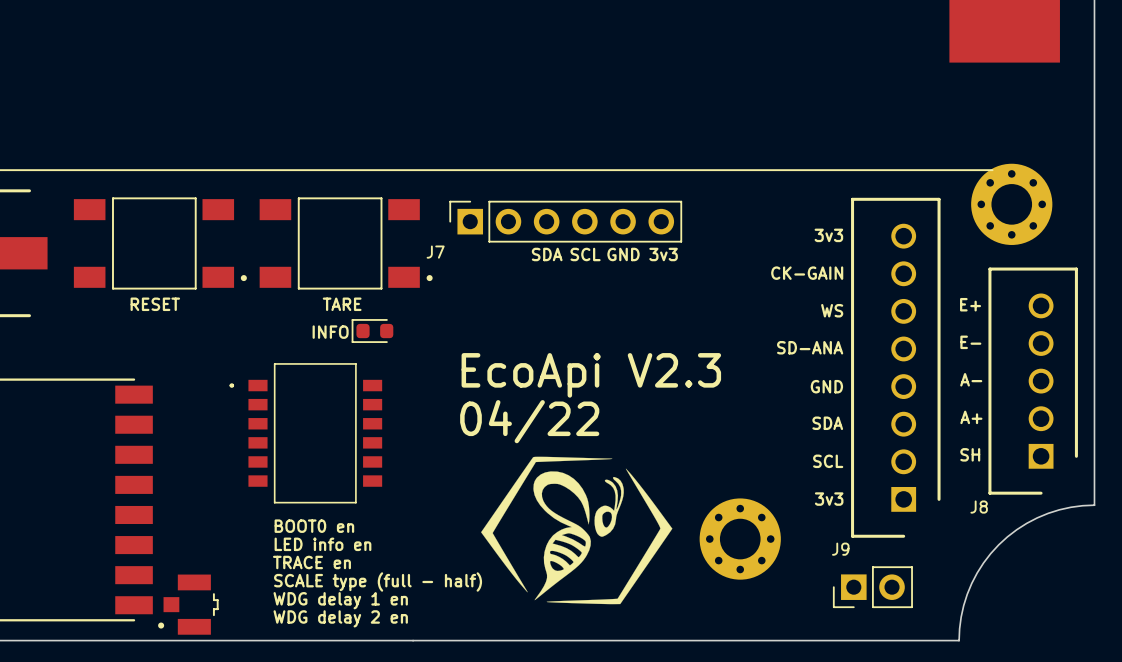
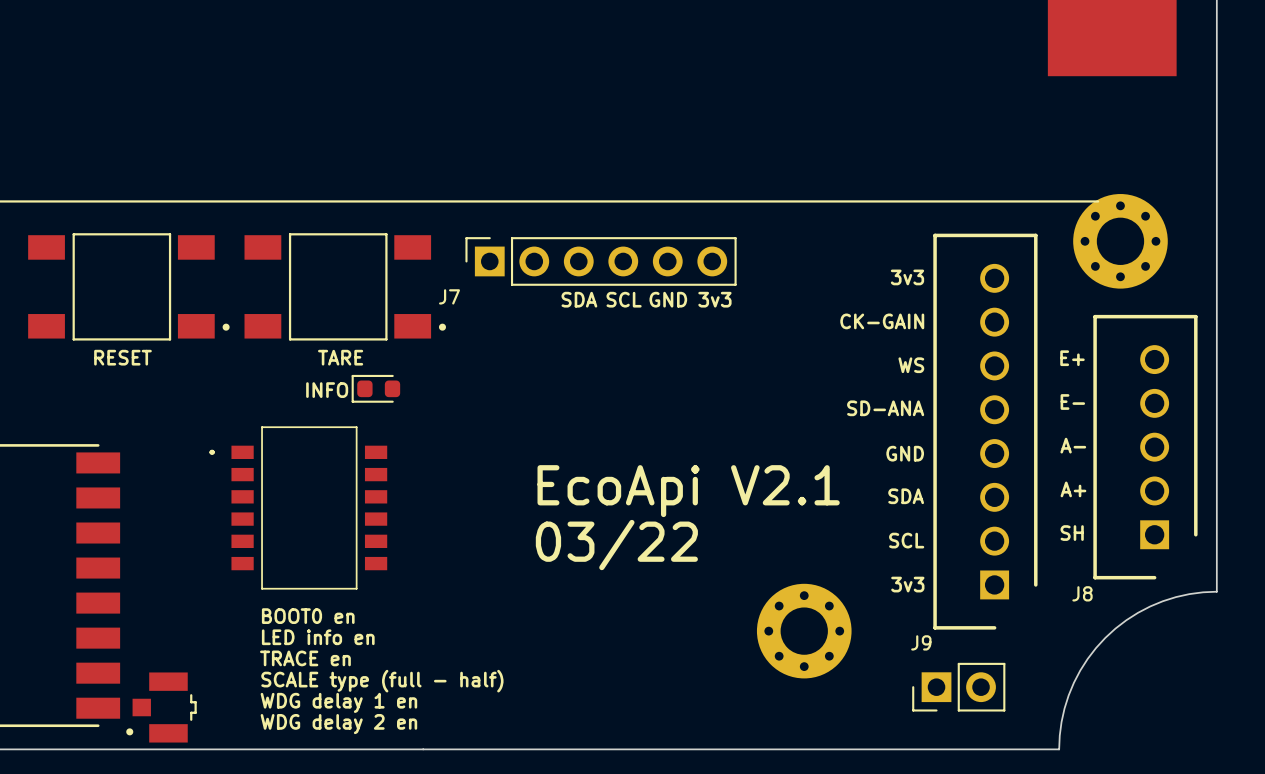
text: EcoApi V2.3 (591, 375) -> EcoApi V2.1 (688, 491)
text: 04/22 (529, 421) -> 03/22 (616, 545)
drawing: [481, 456, 673, 605] -> none

